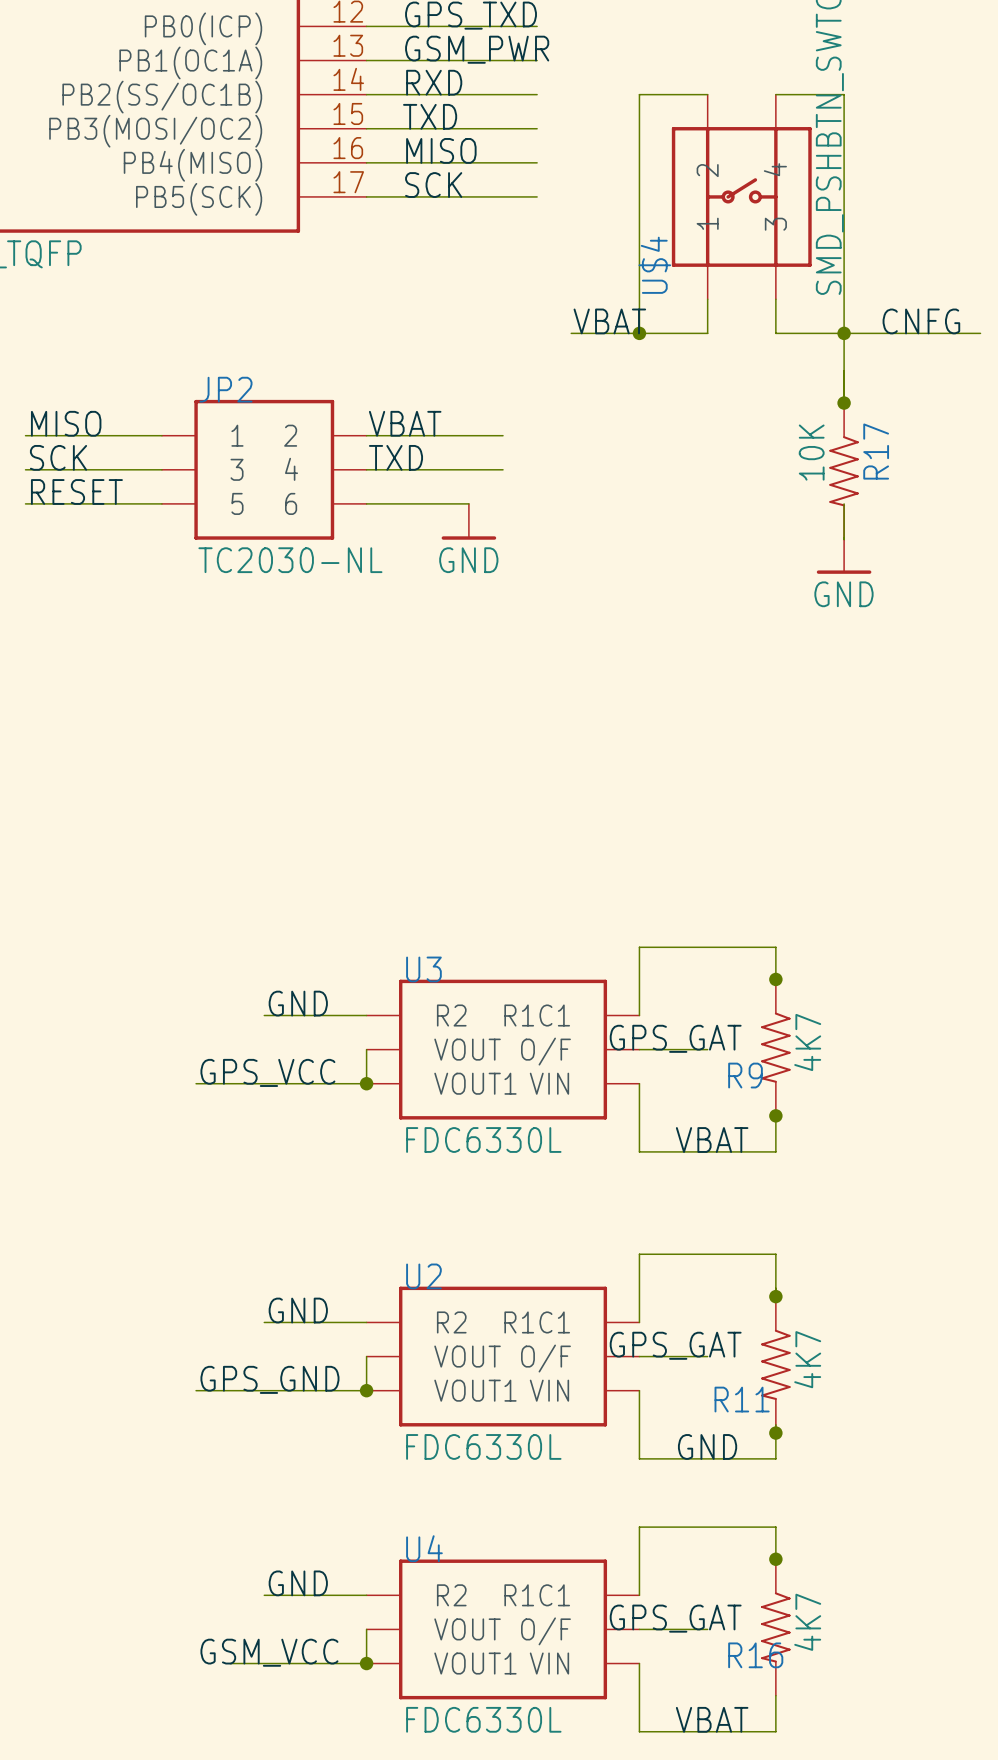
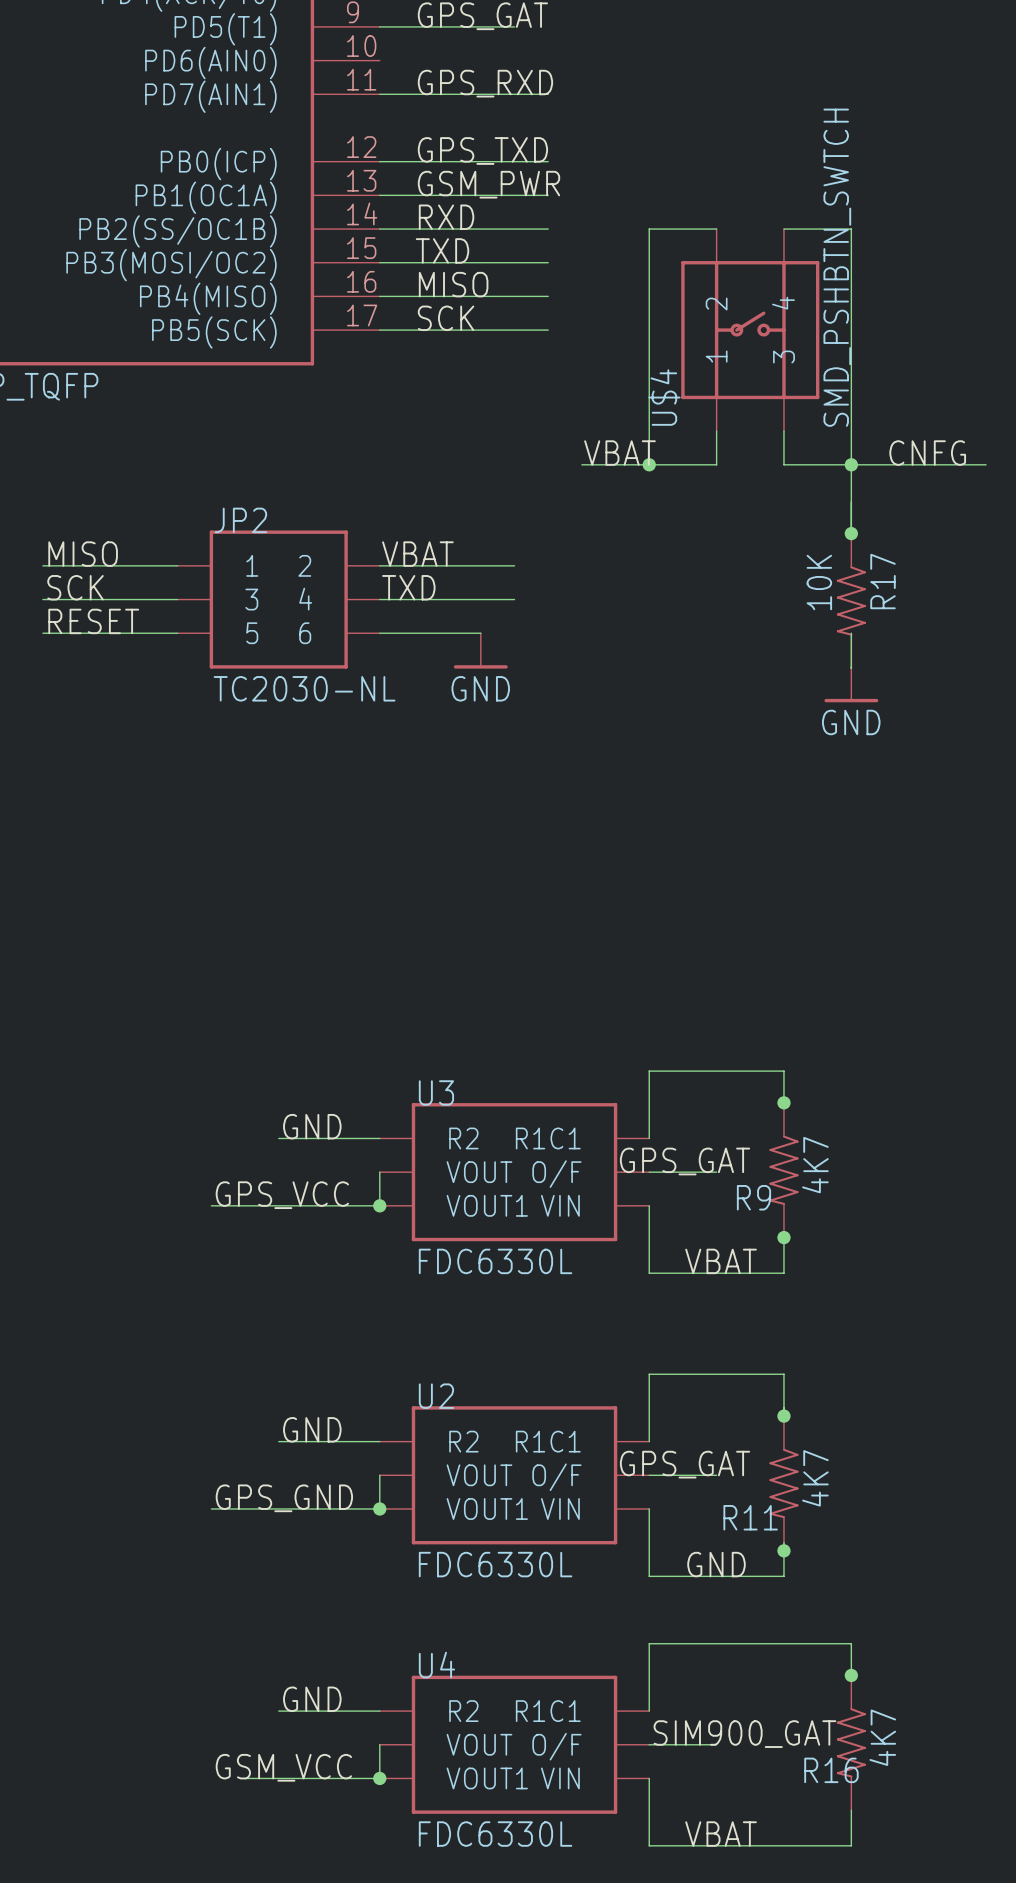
wire: (775, 1527) (775, 1564) -> (783, 1643) (851, 1643) (851, 1680)
junction position: (775, 1559) -> (851, 1675)
label: GPS_GAT (675, 1618) -> none
label: none -> SIM900_GAT (744, 1734)
R16 position: (775, 1627) -> (851, 1742)
wire: (775, 1695) (775, 1731) -> (851, 1810) (851, 1845) (783, 1845)

